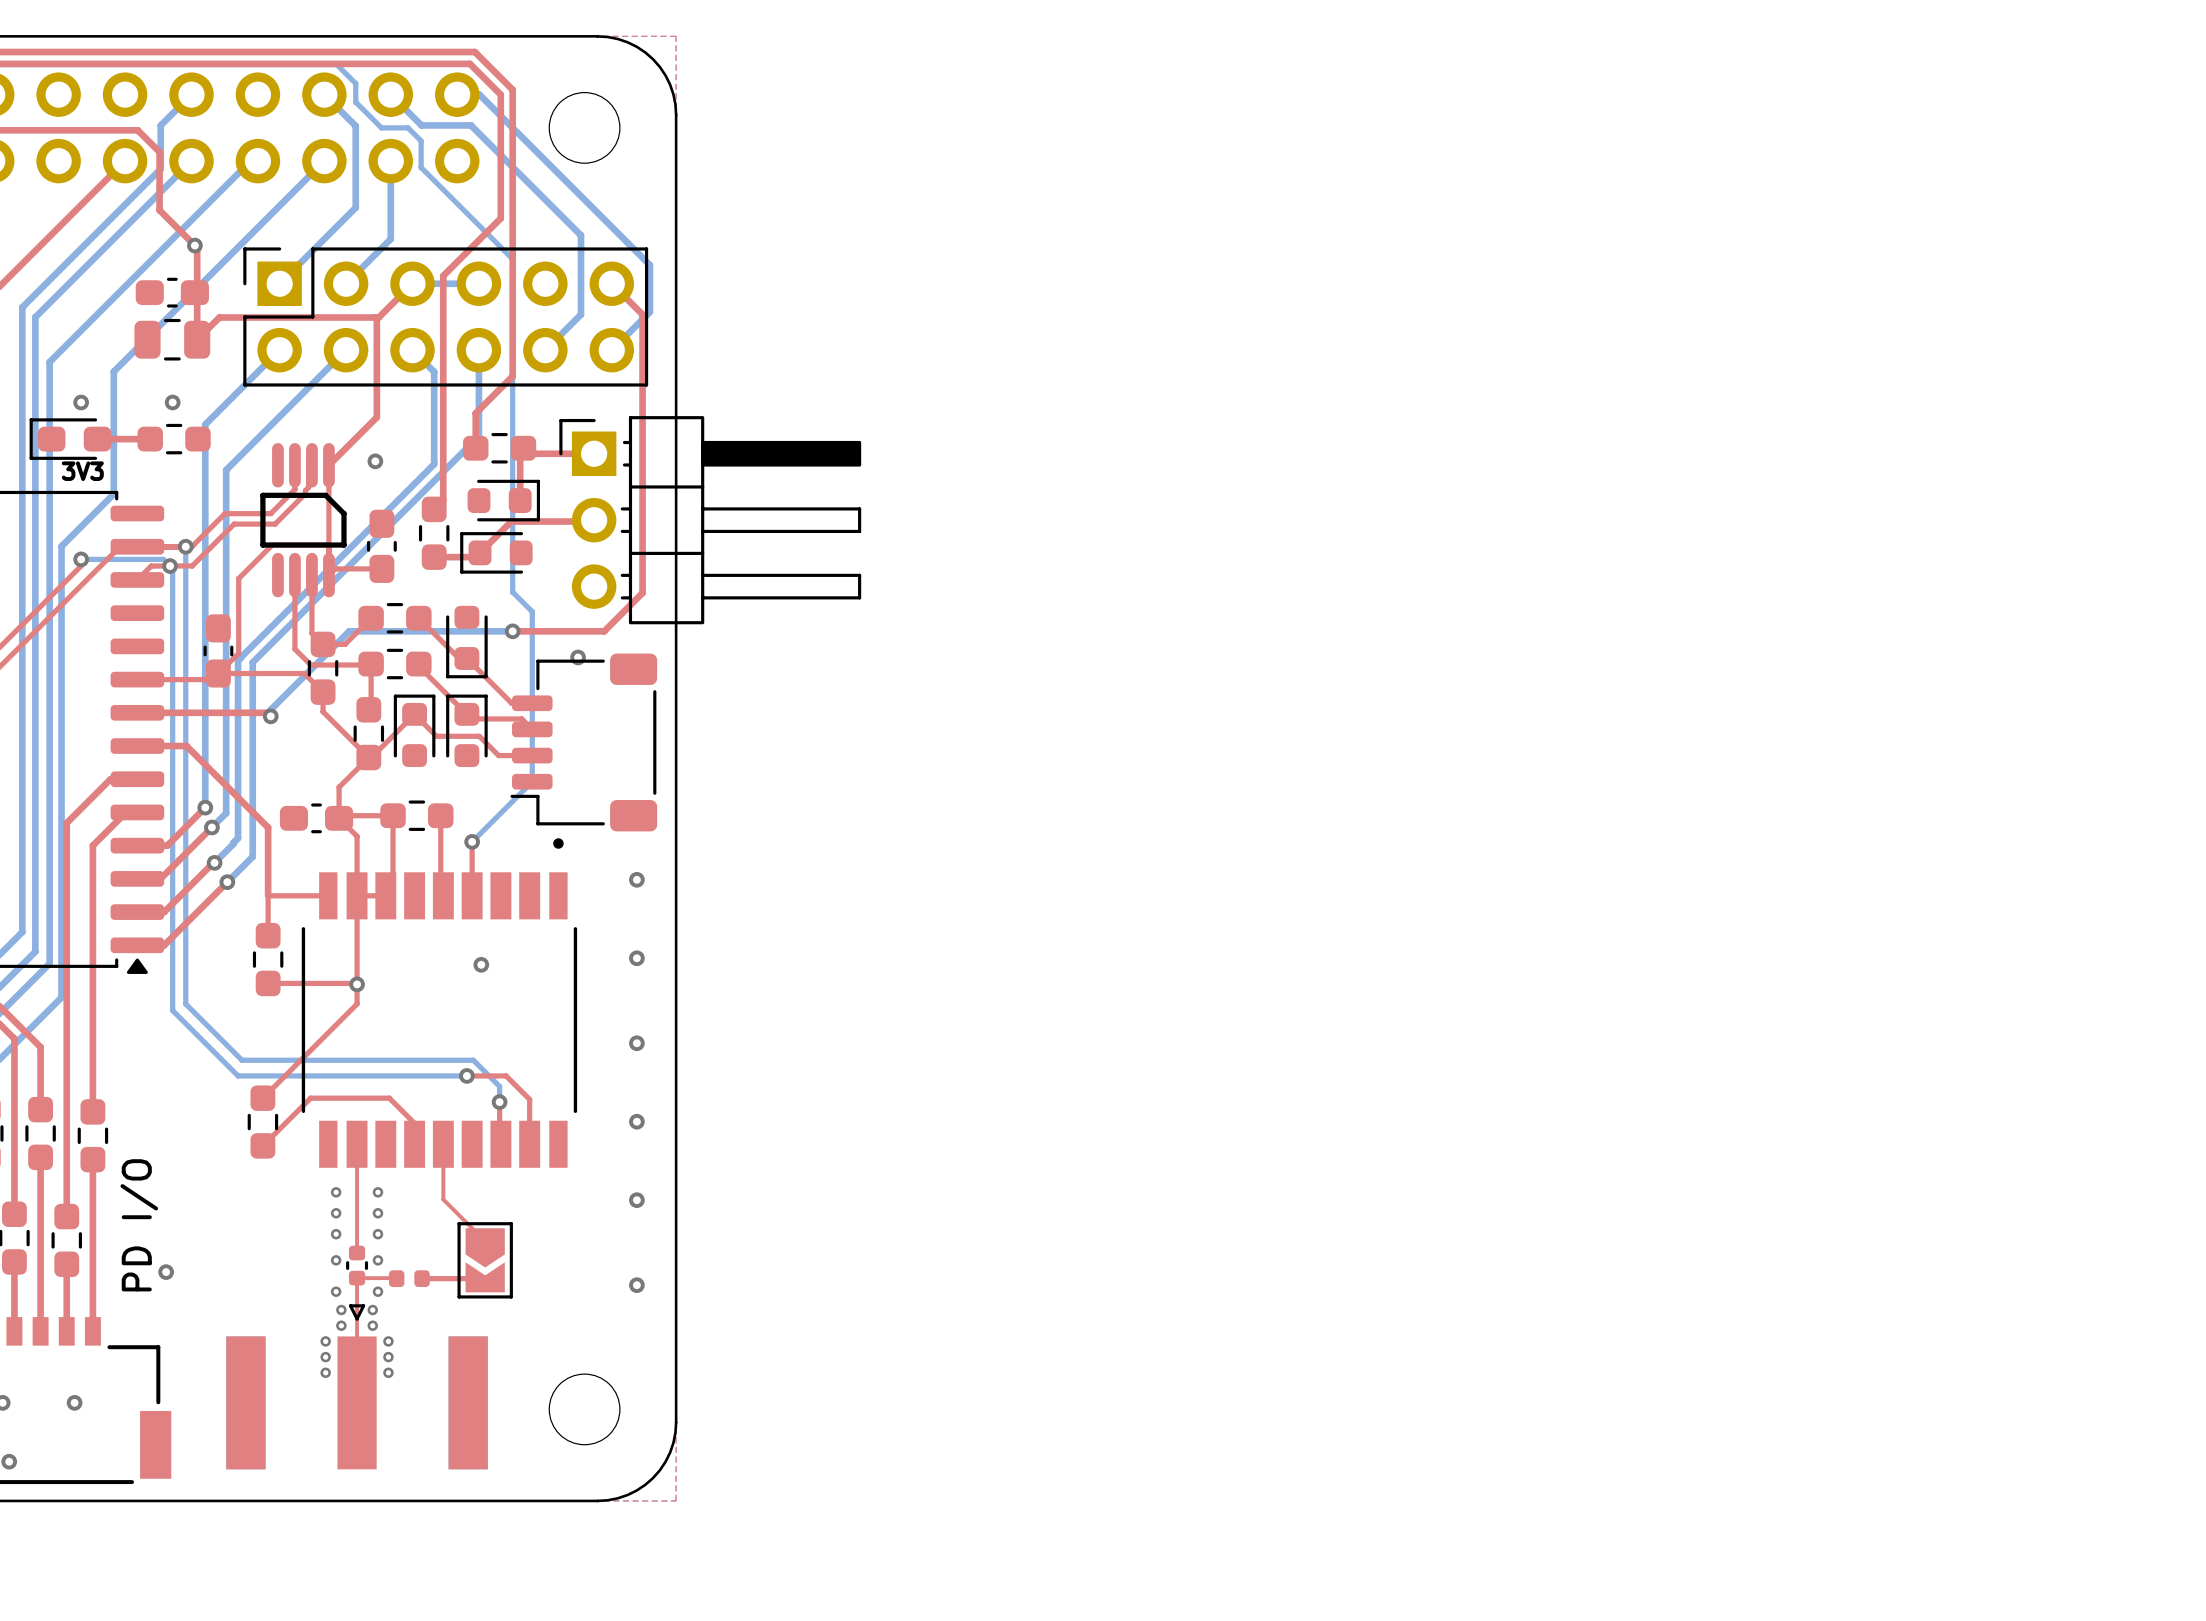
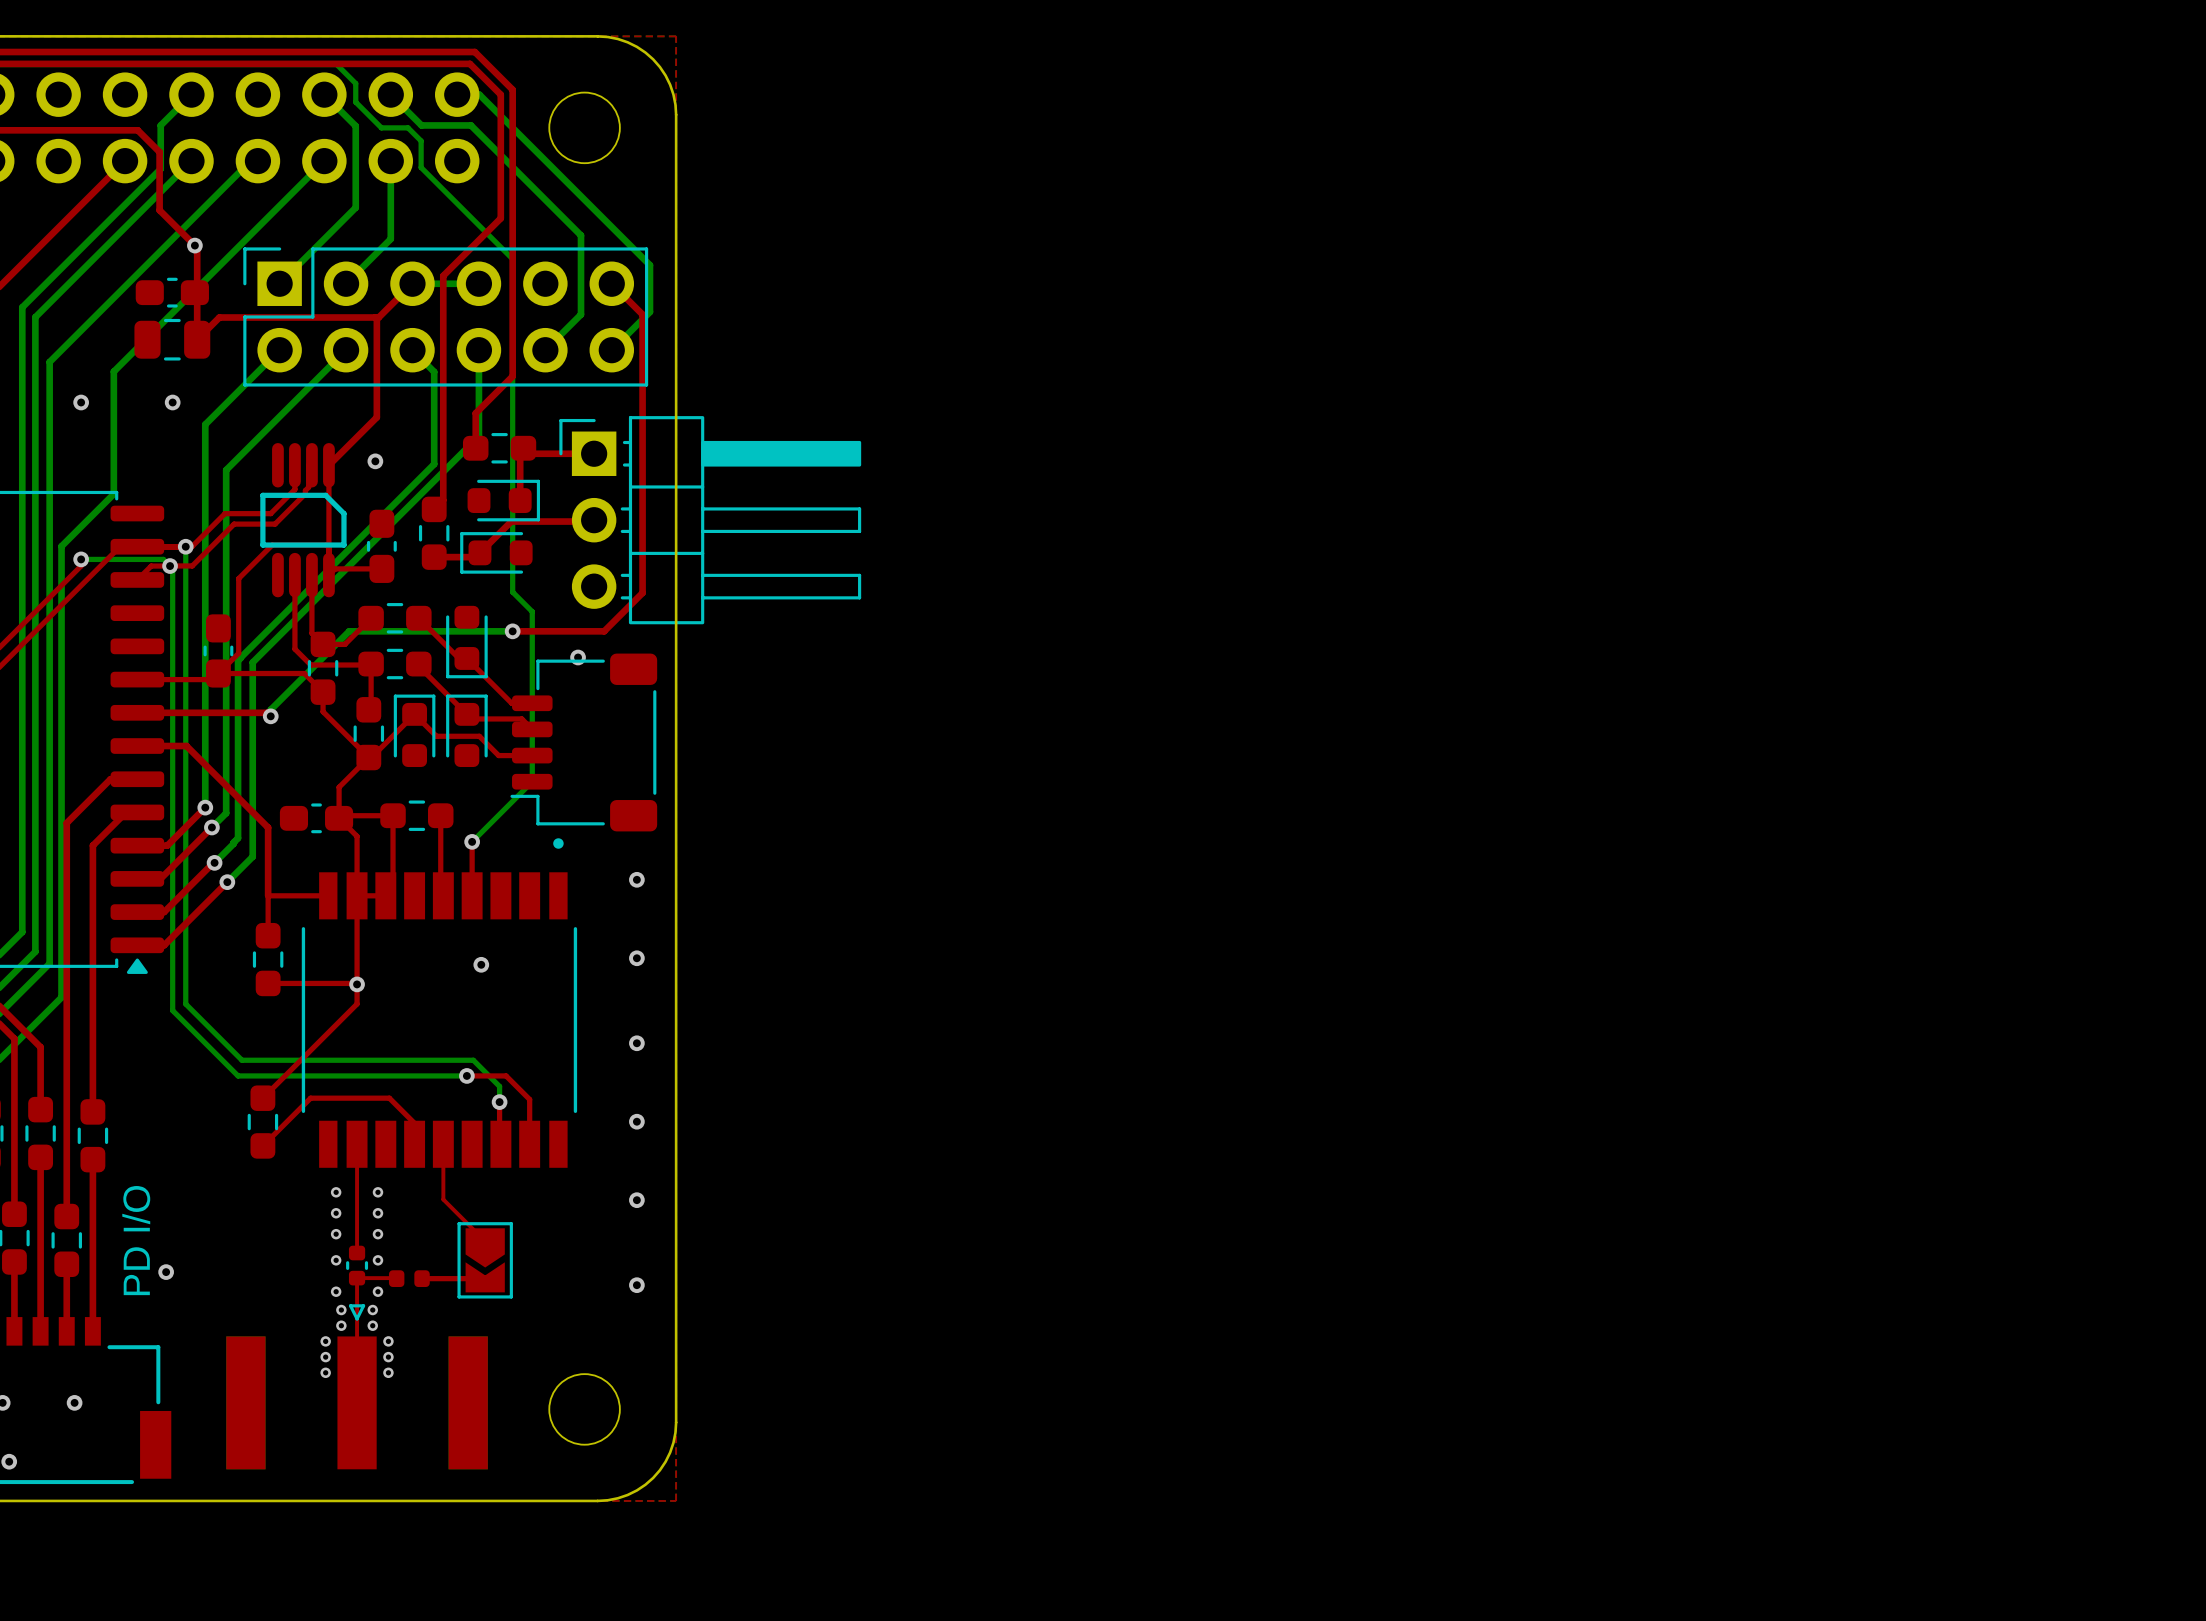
part: (70, 439) -> none
top track: (97, 439) (150, 439) -> none
part: (174, 439) -> none
text: 3V3 (82, 471) -> none

